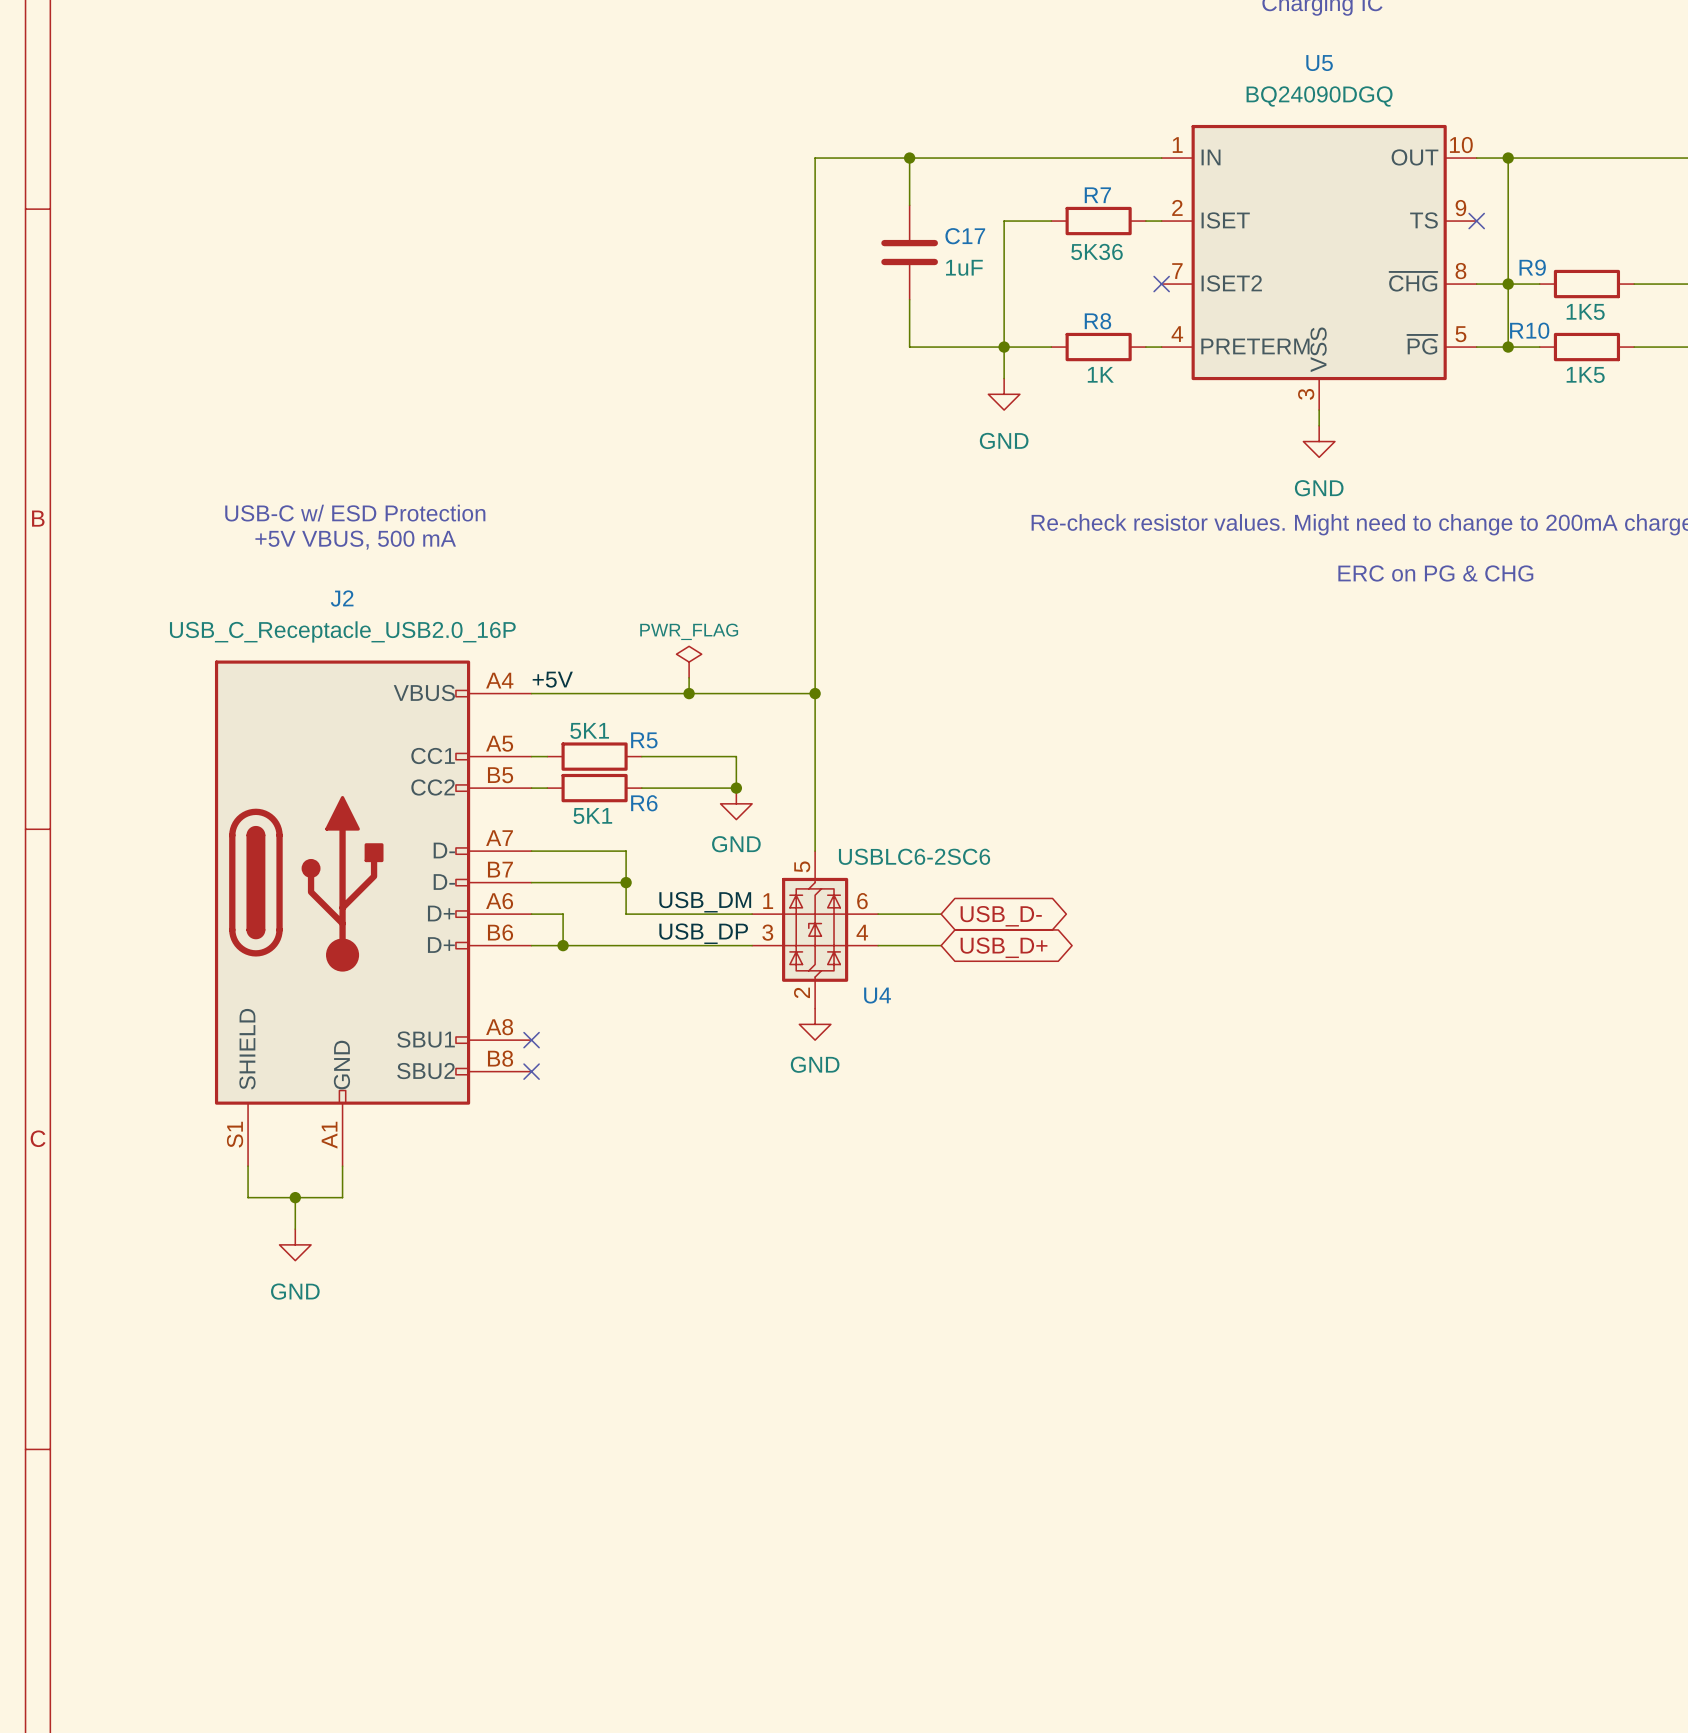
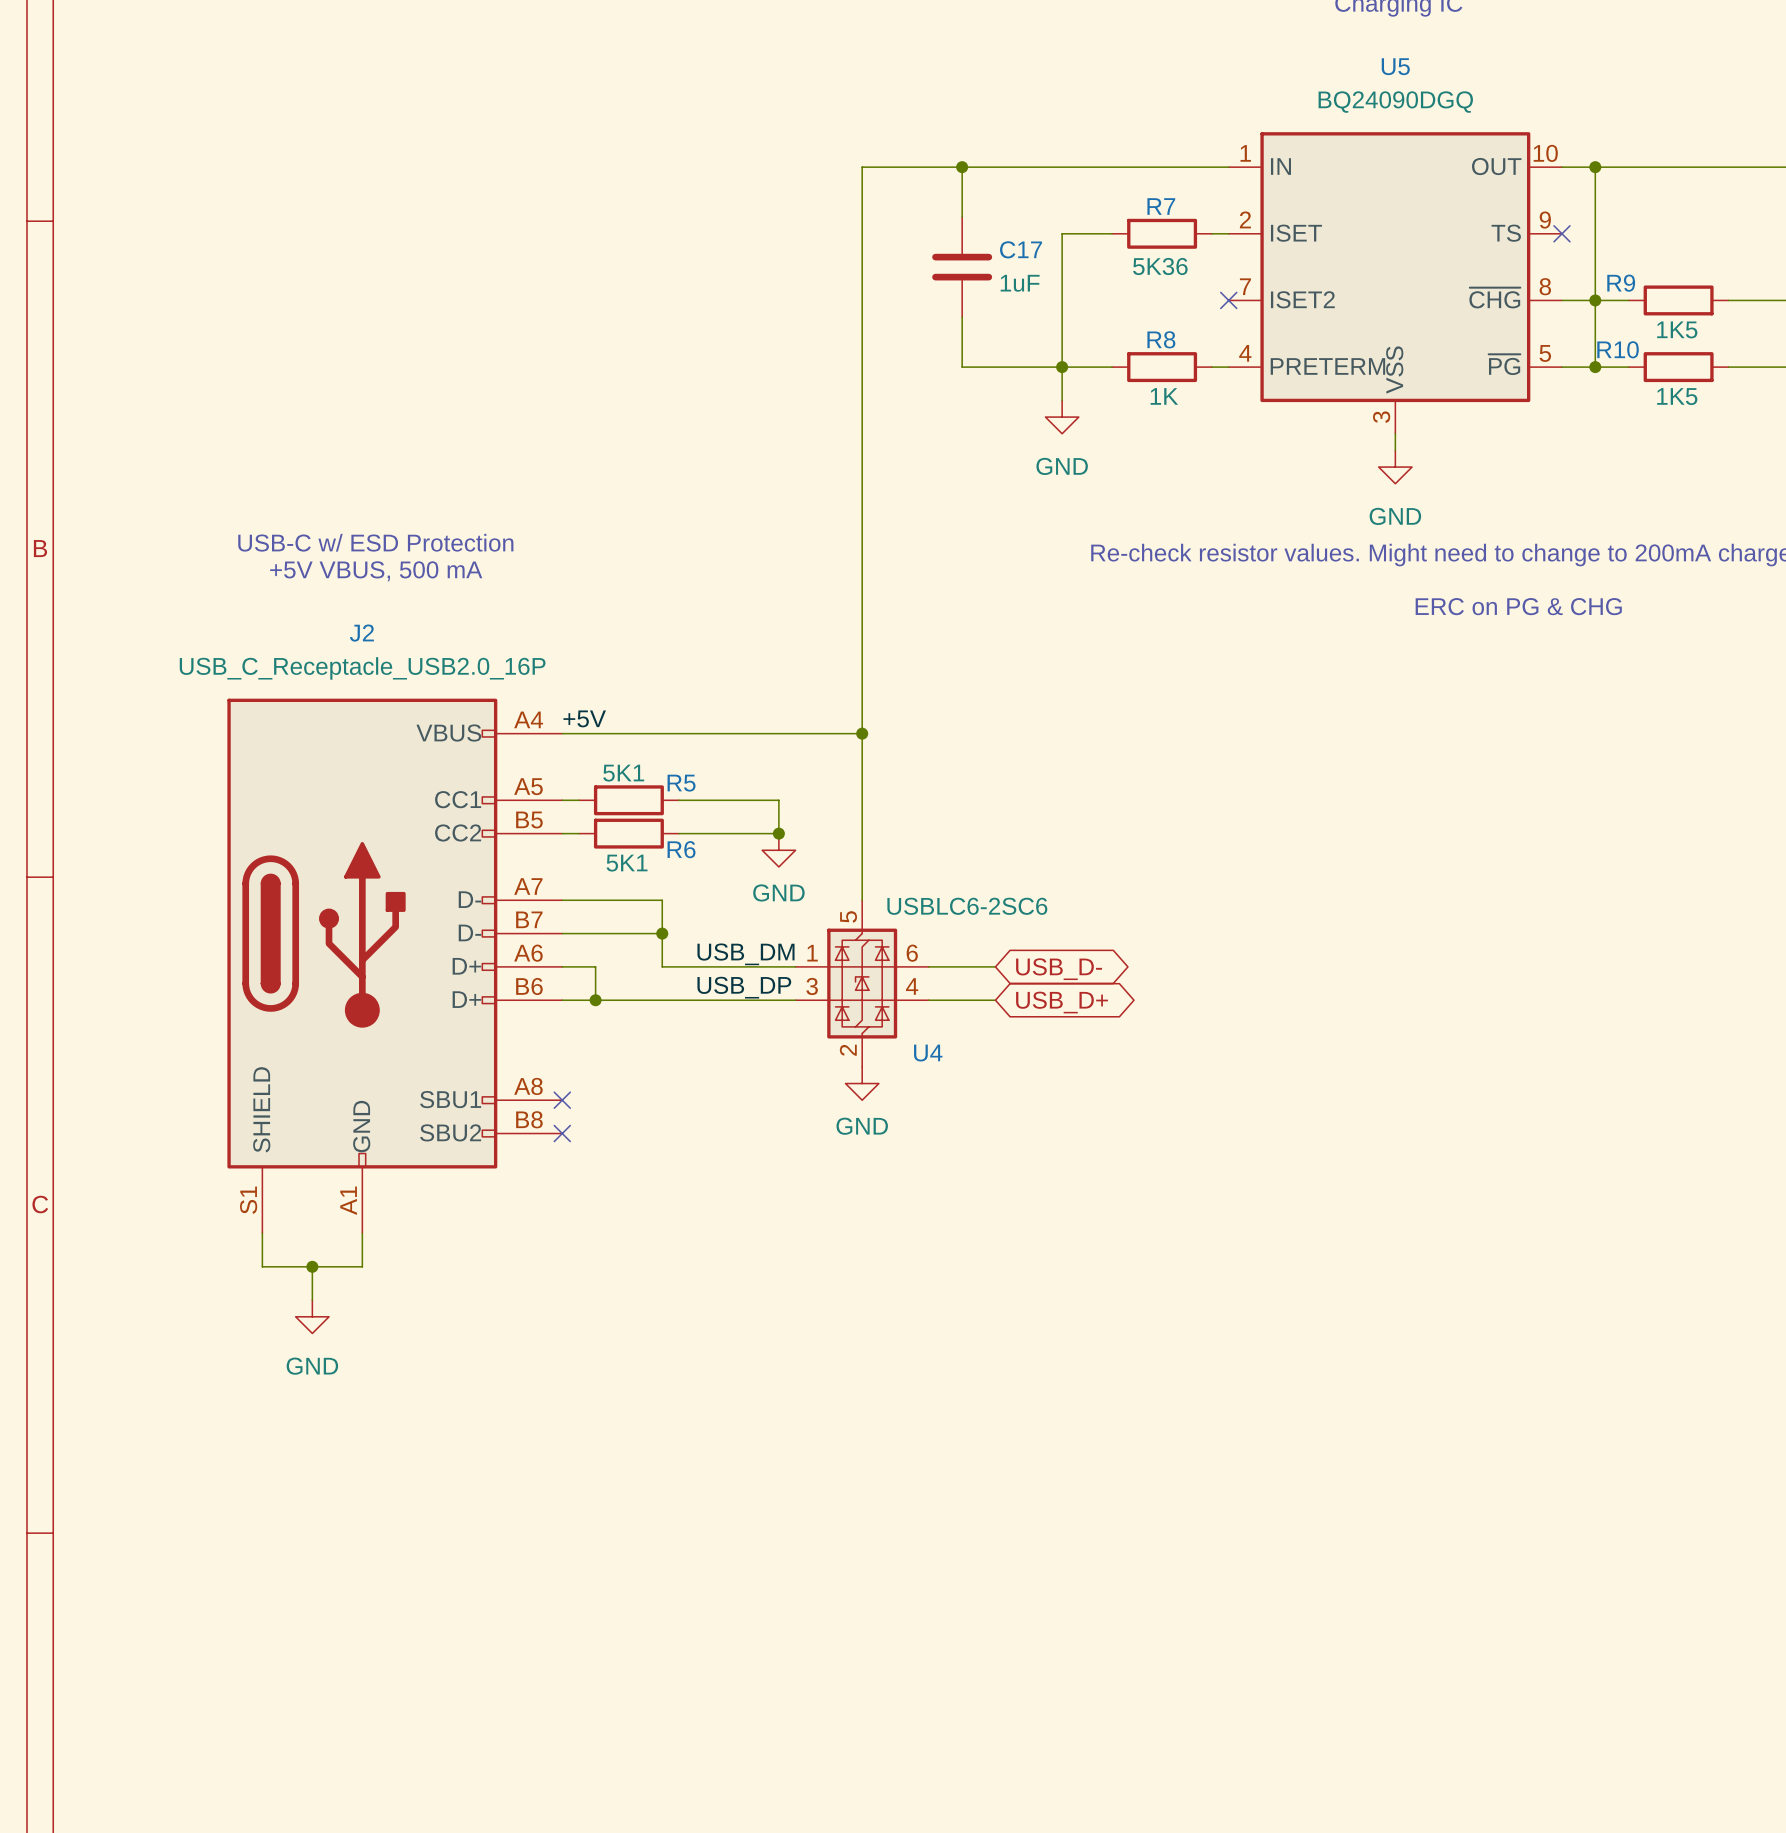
power symbol: PWR_FLAG (689, 662) -> none
wire: (689, 677) (689, 693) -> none
junction: (689, 693) -> none

